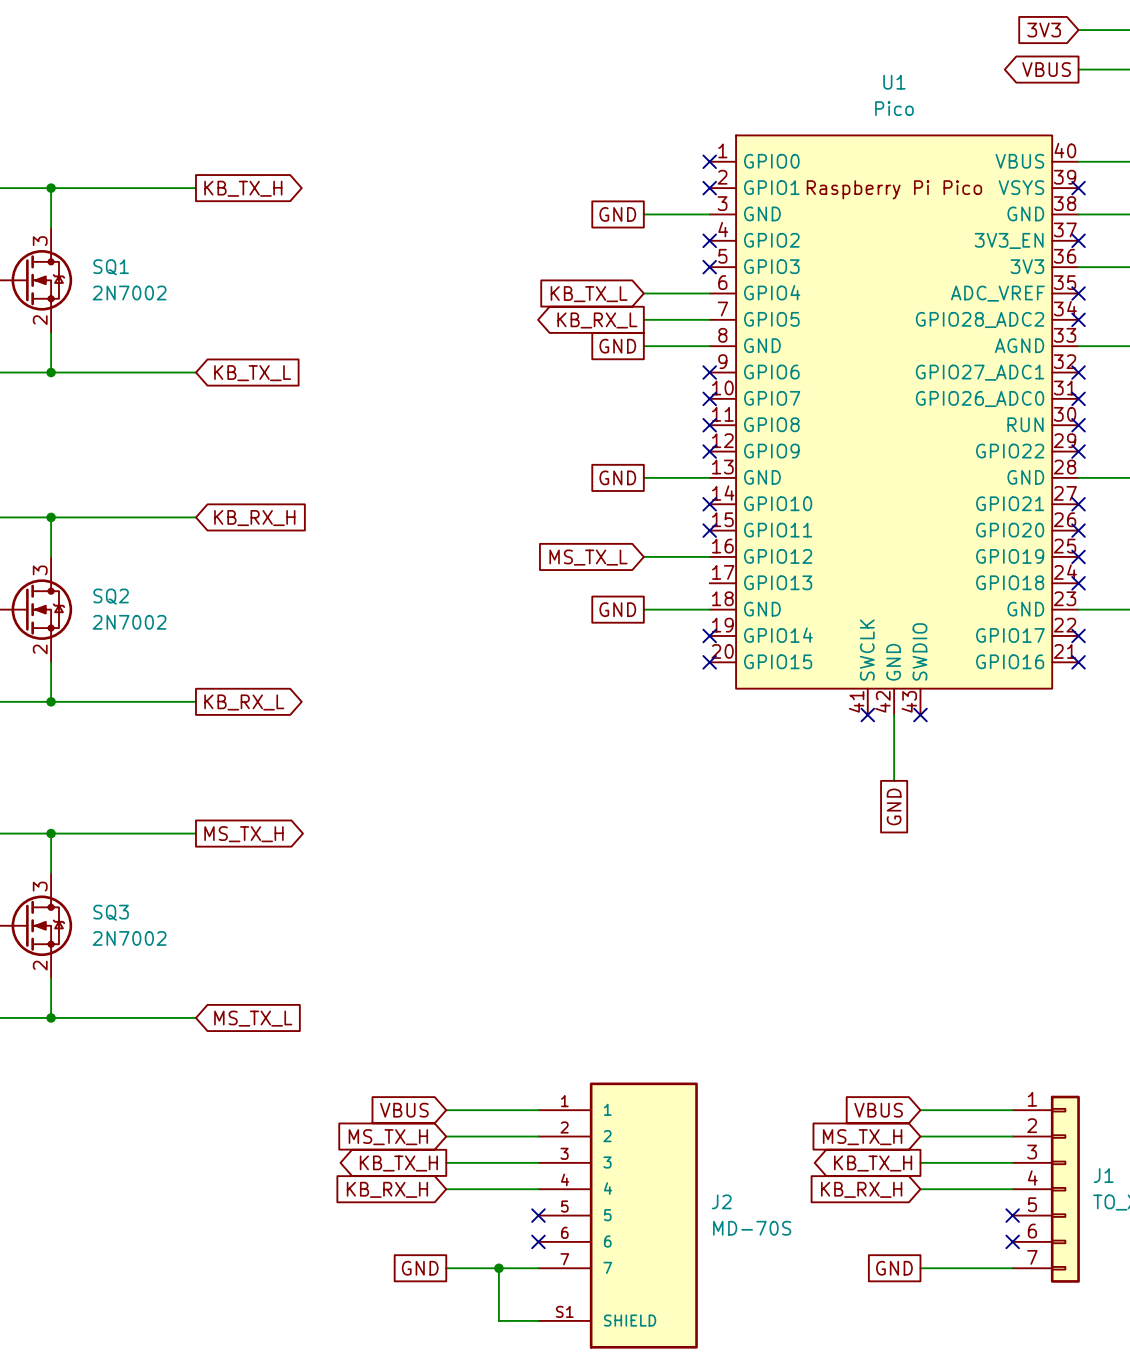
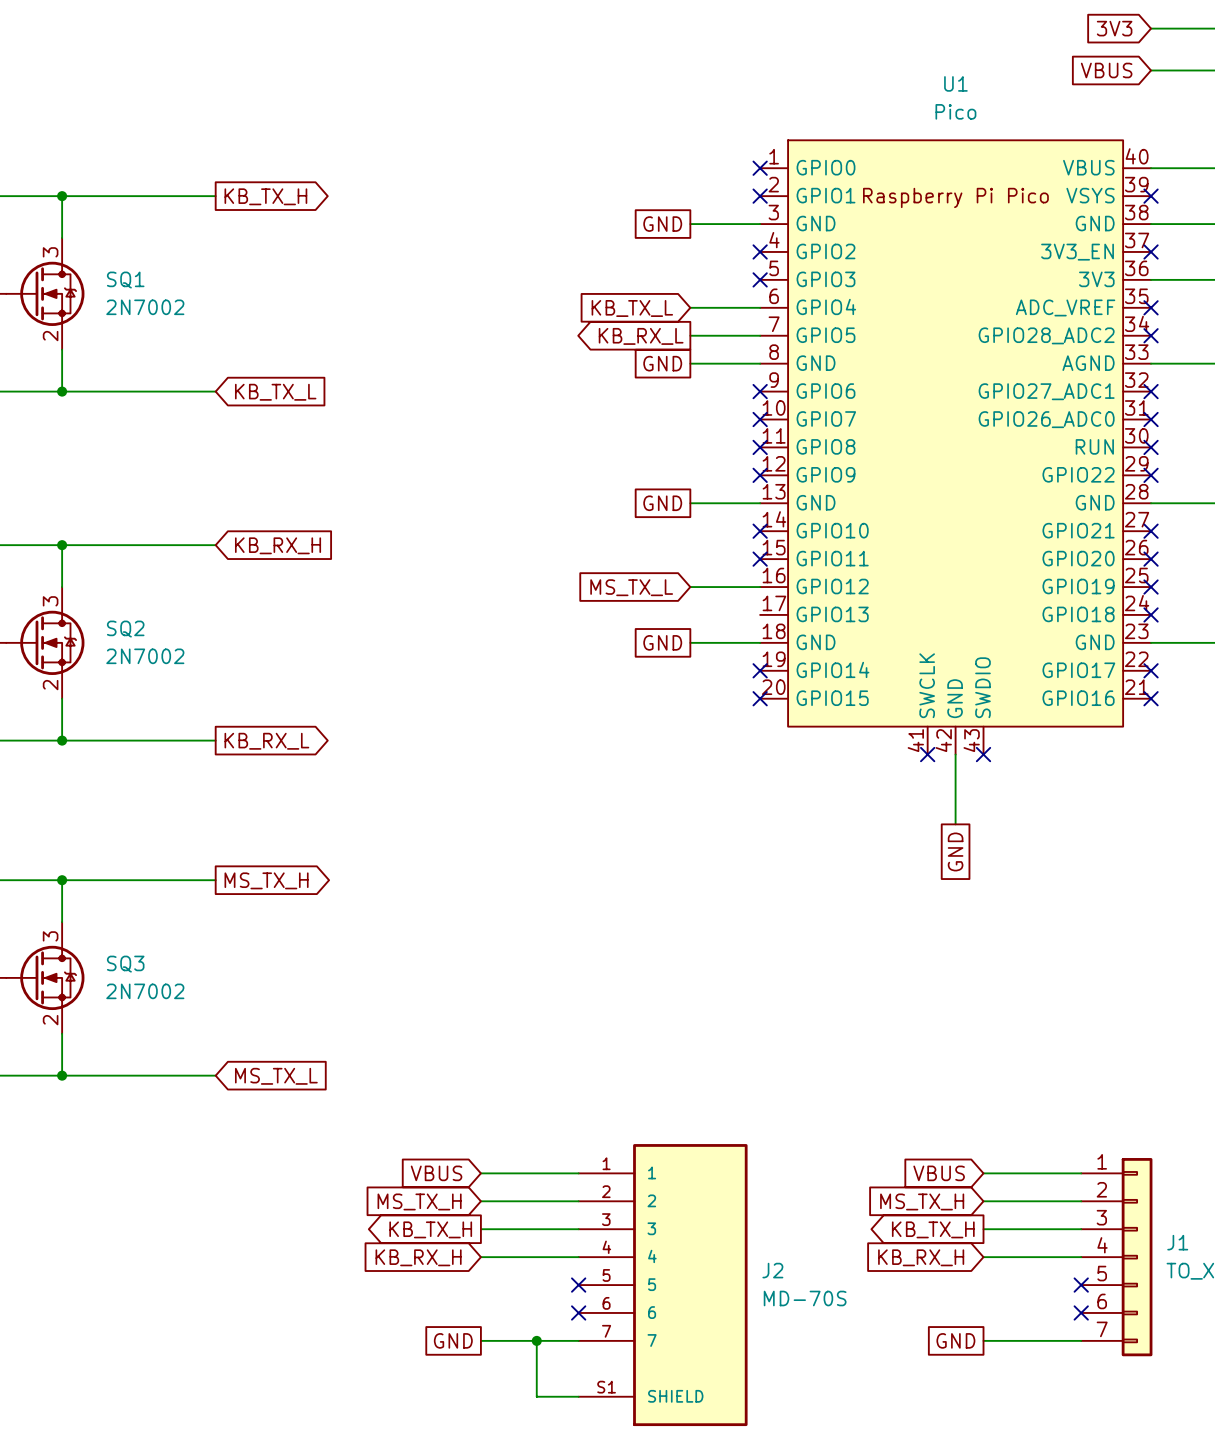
global label shape: output (1046, 69) -> input (1106, 70)

